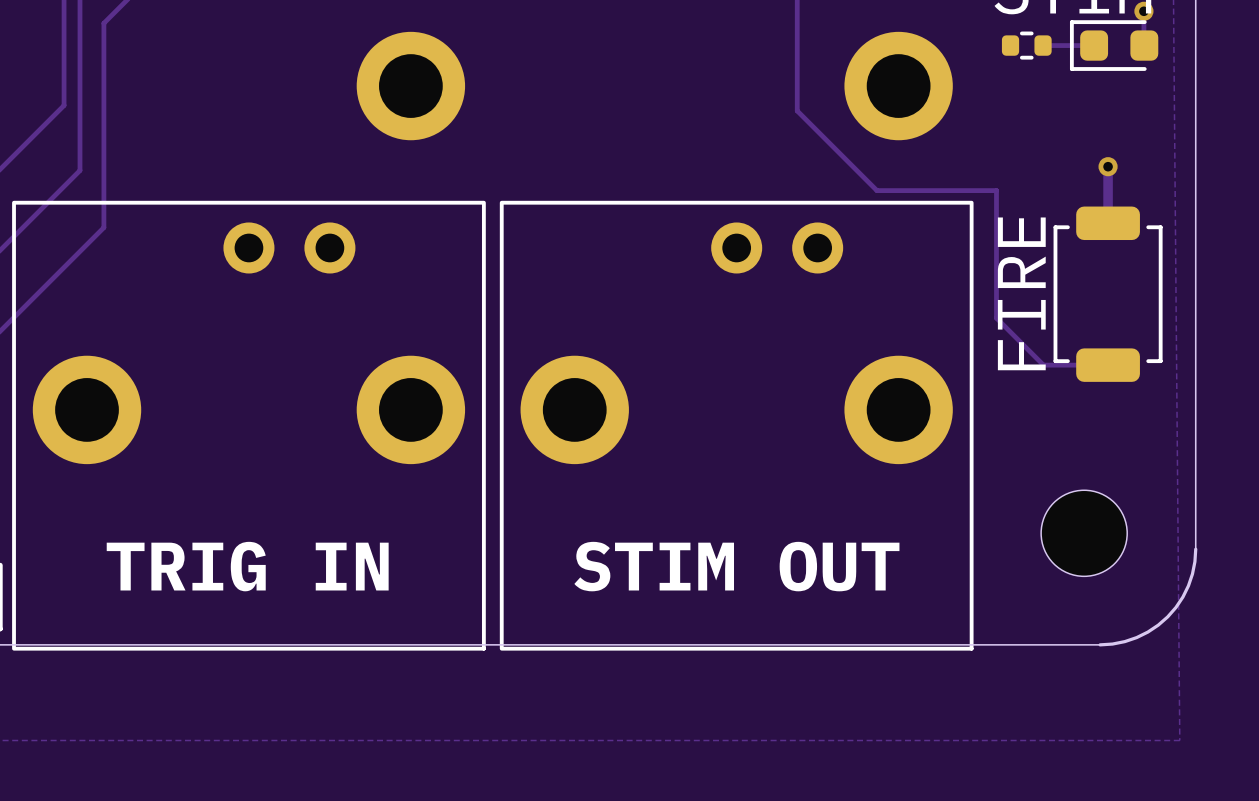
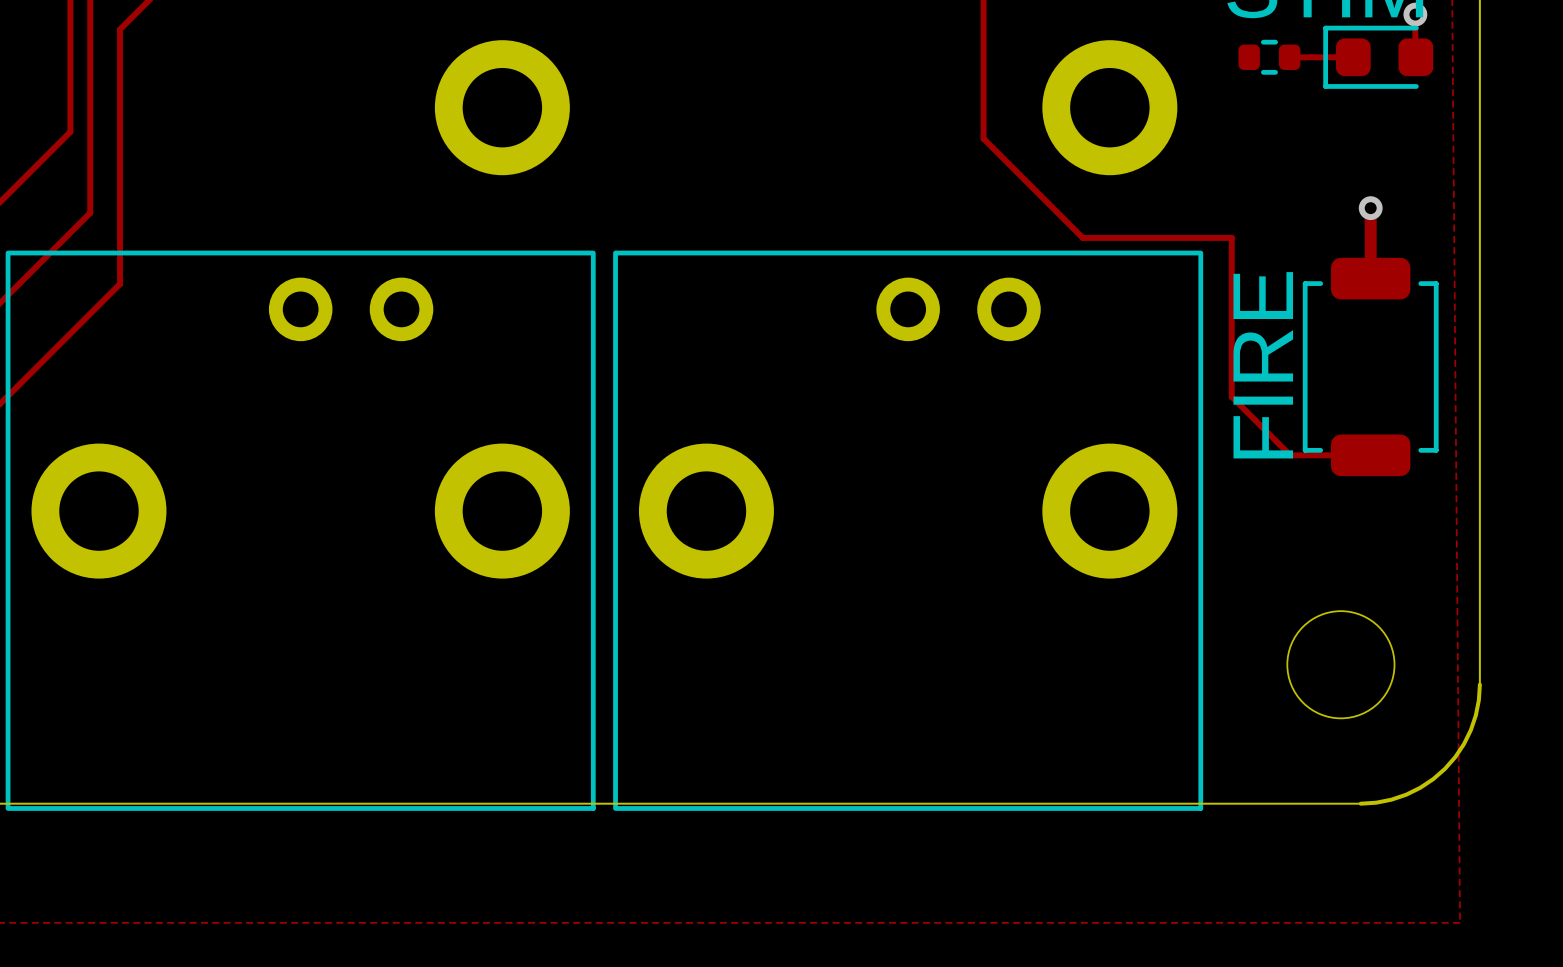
text: TRIG IN (247, 566) -> none
text: STIM OUT (736, 566) -> none

